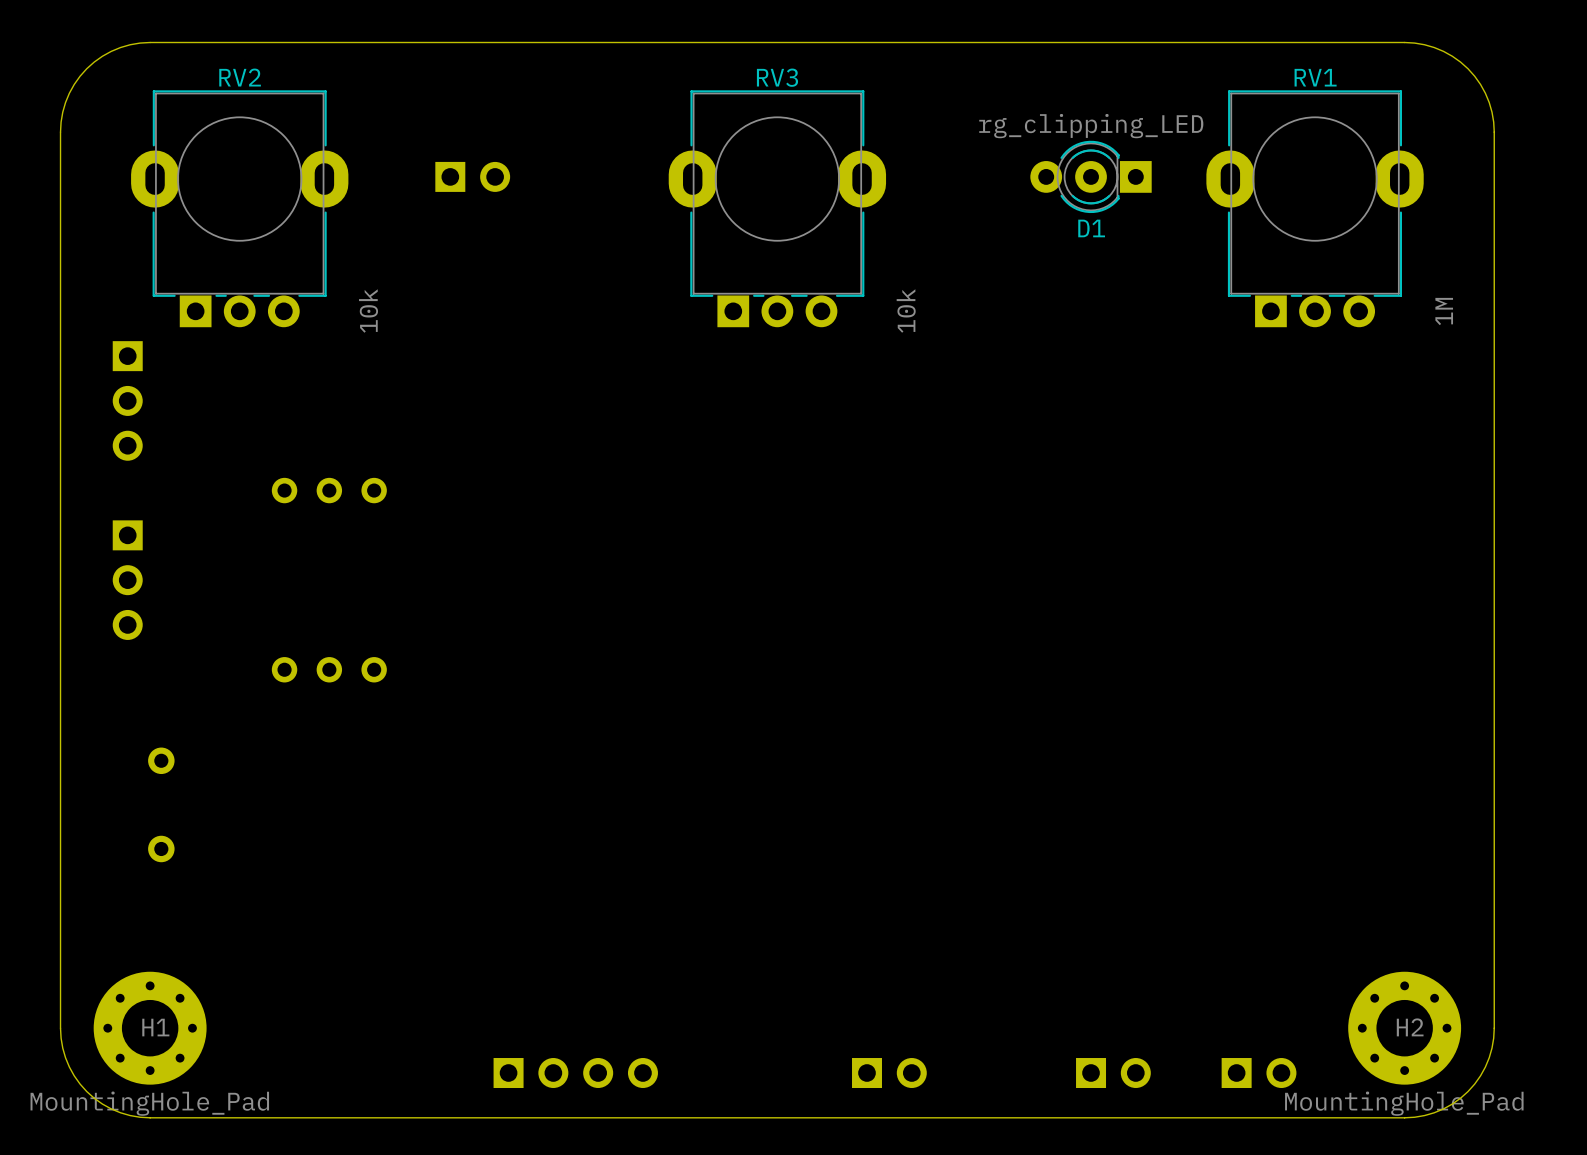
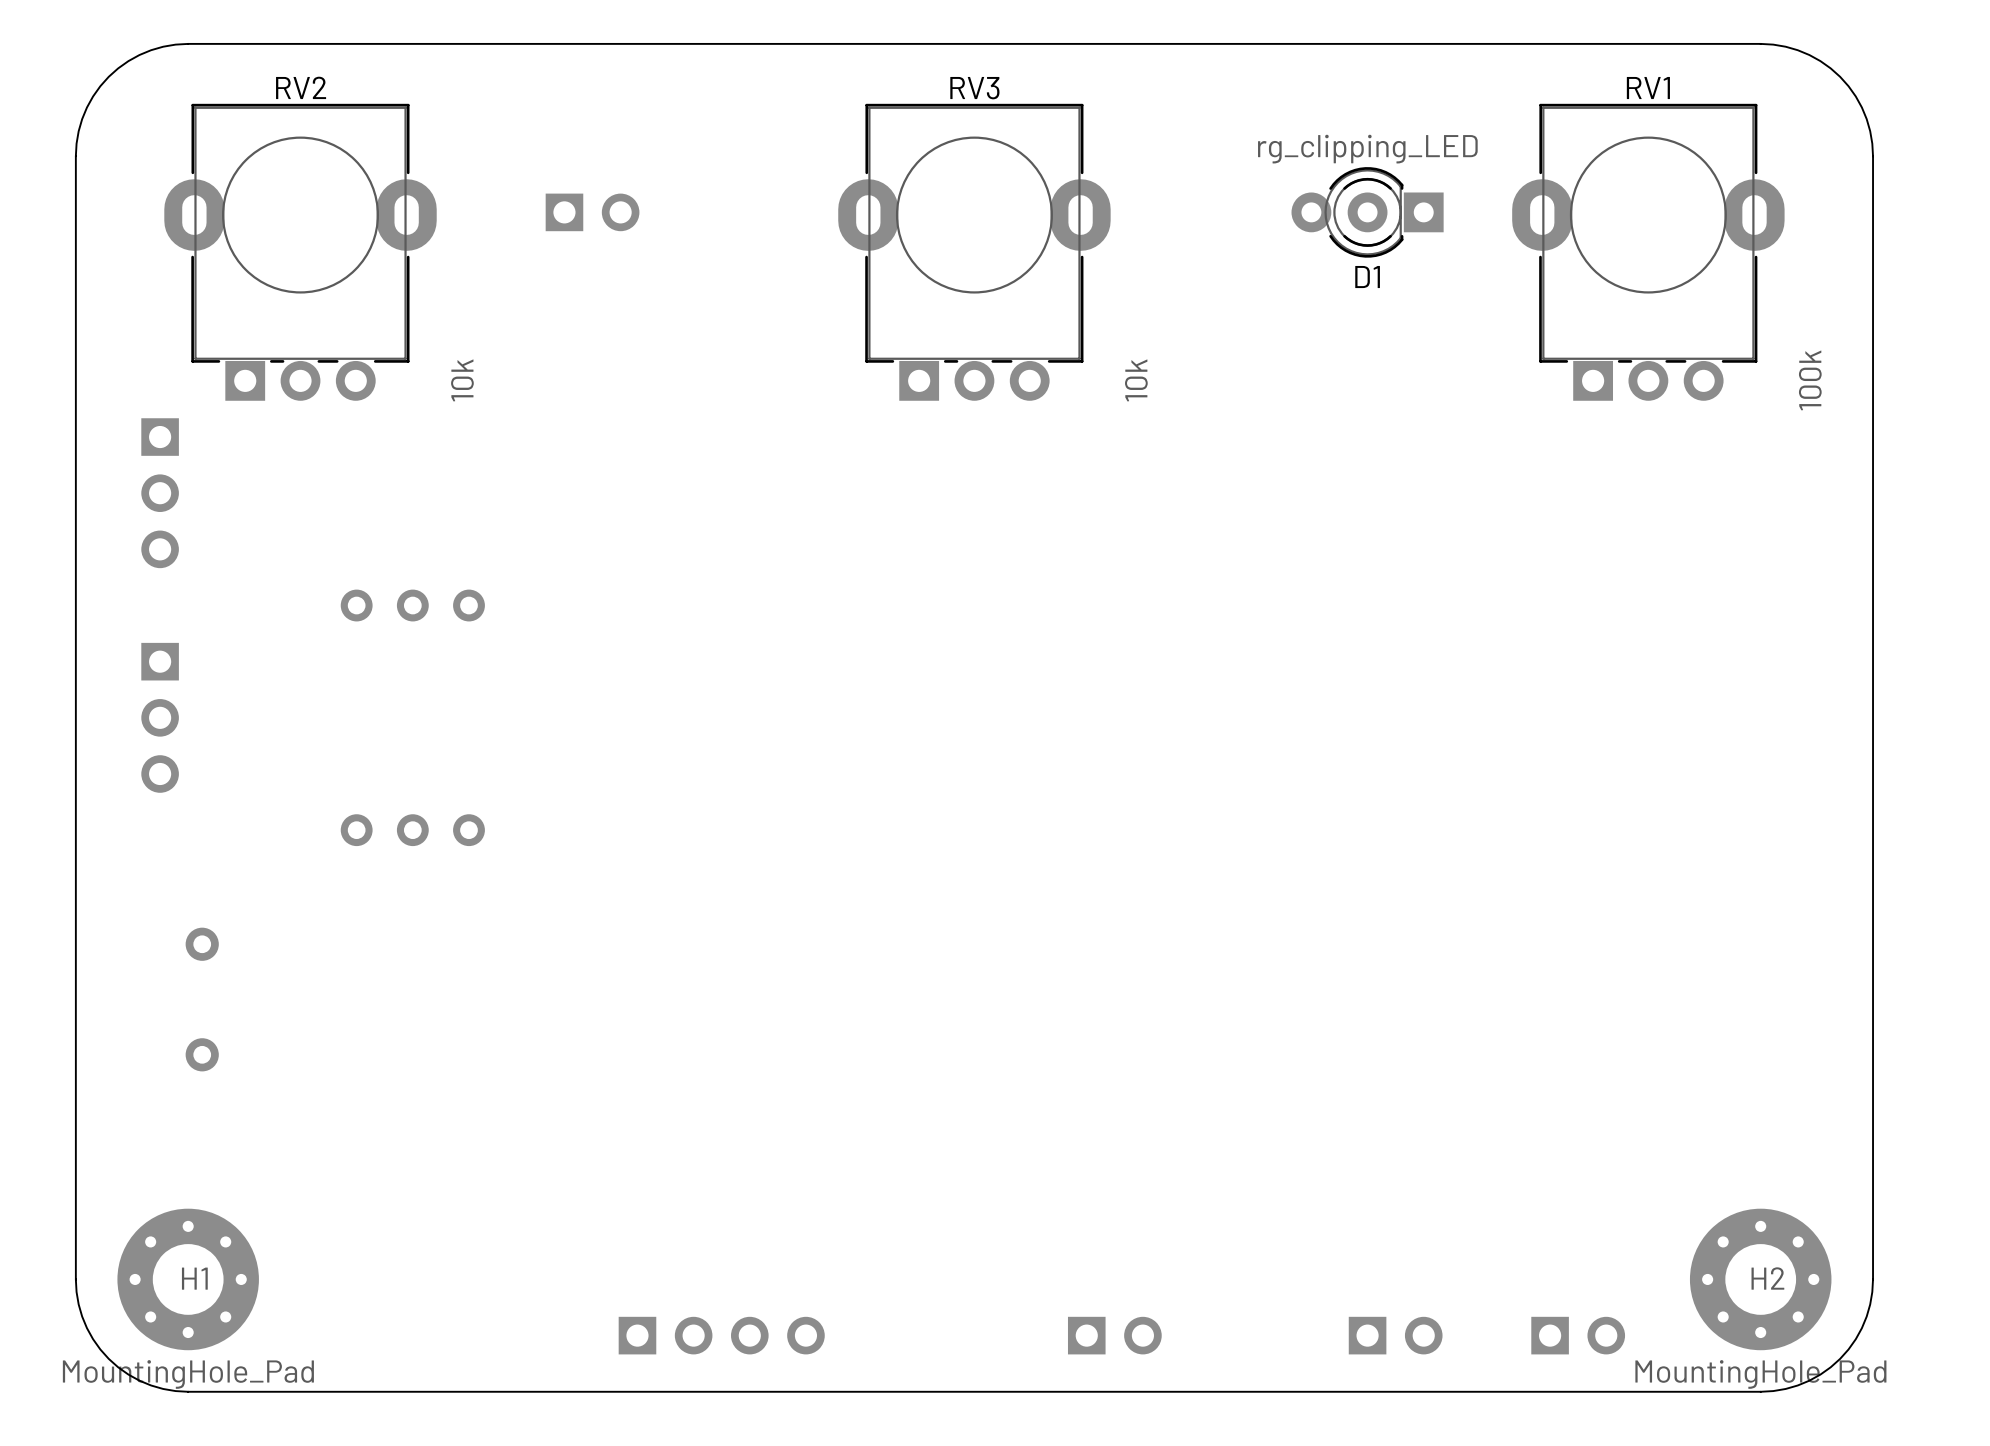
RV1 value: 1M (1444, 311) -> 100k (1810, 380)

